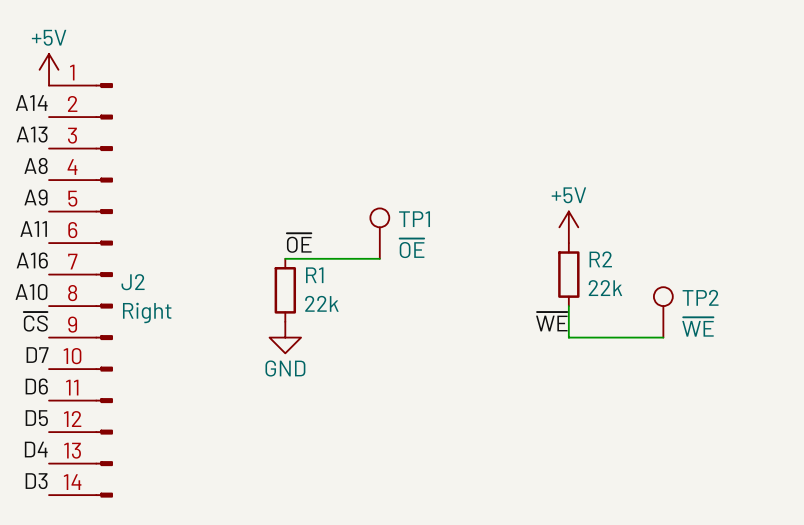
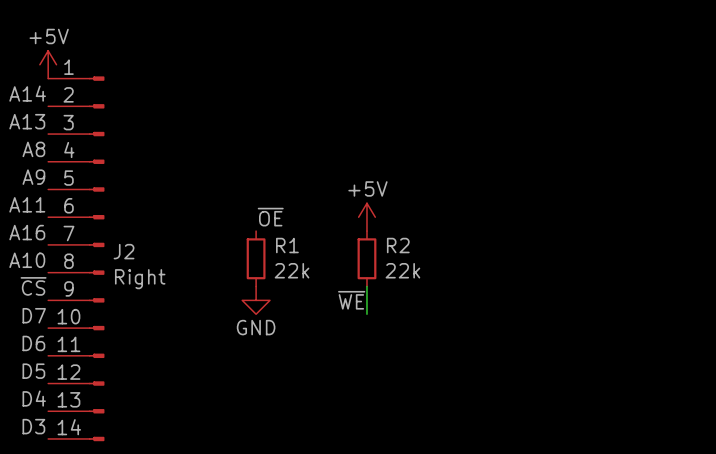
power symbol position: +5V (568, 227) -> +5V (366, 217)
TP1: ~{OE} (379, 233) -> none
wire: (285, 258) (379, 258) -> none
R2 position: (568, 274) -> (366, 258)
wire: (568, 306) (568, 337) (663, 337) -> none
TP2: ~{WE} (663, 312) -> none
wire: none -> (366, 286) (366, 314)
label position: ~{WE} (551, 321) -> ~{WE} (351, 300)

